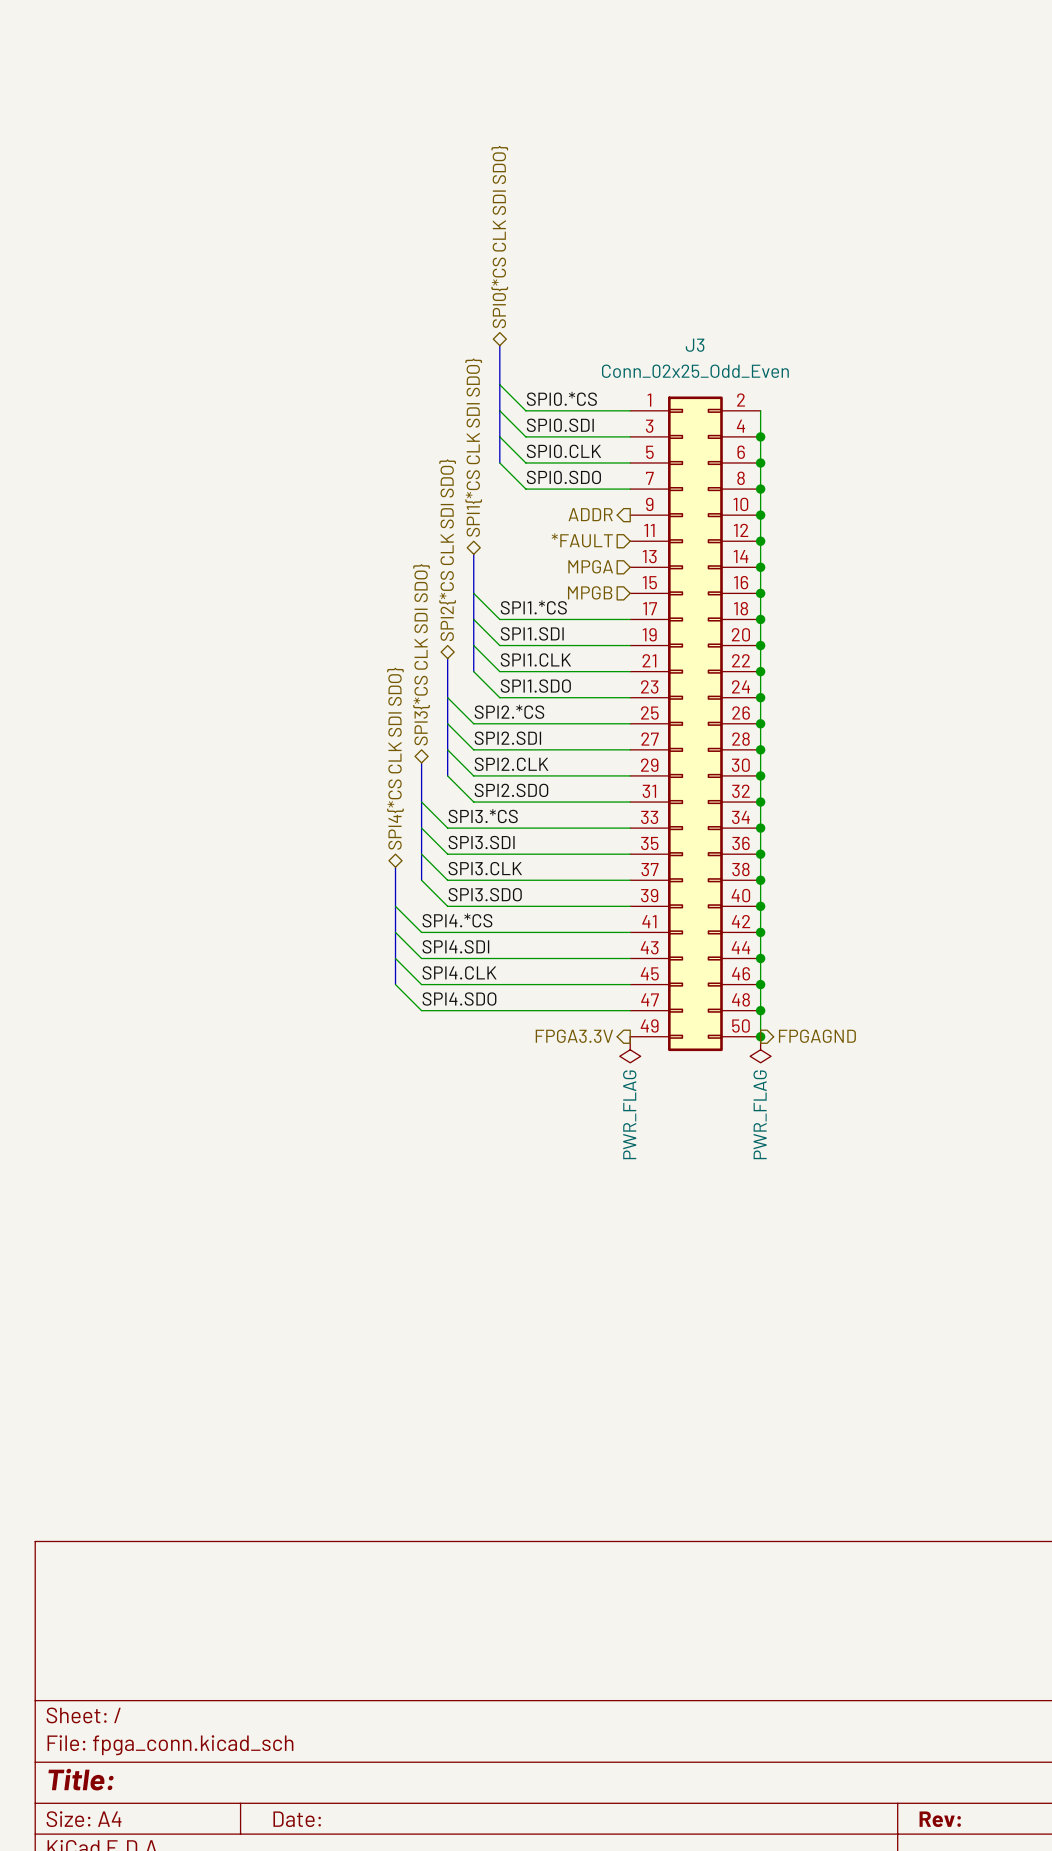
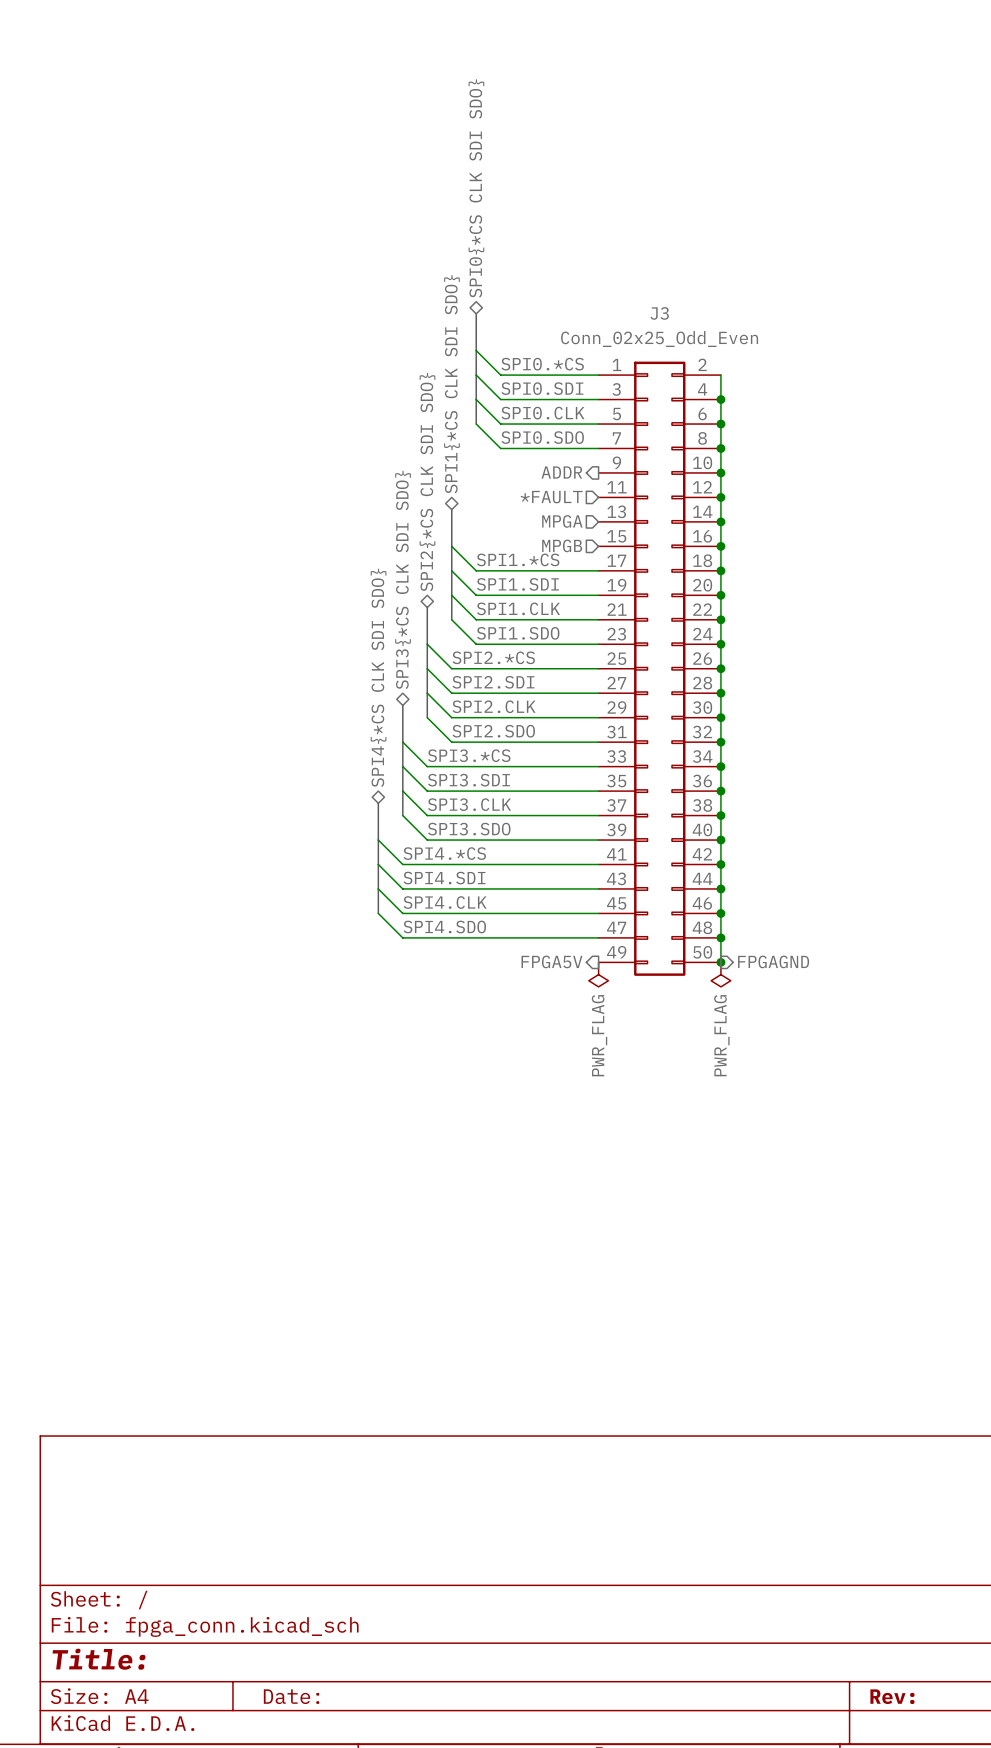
hierarchical label: FPGA3.3V (574, 1036) -> FPGA5V (551, 961)

